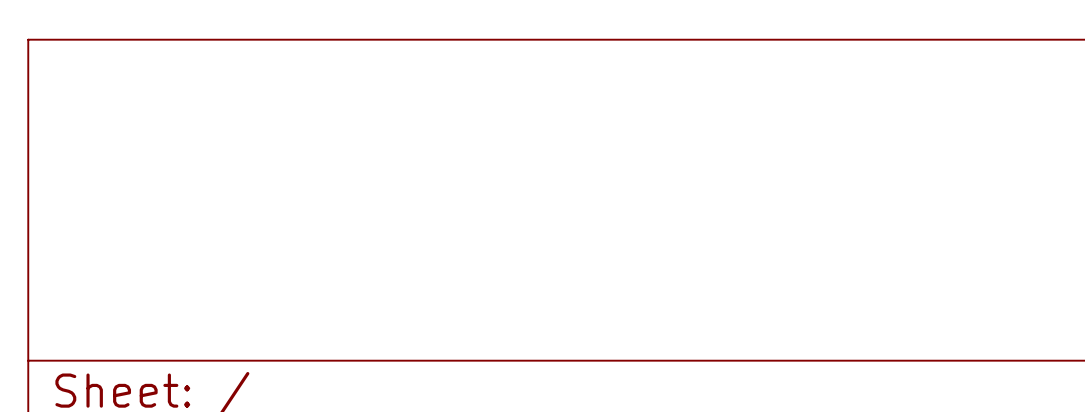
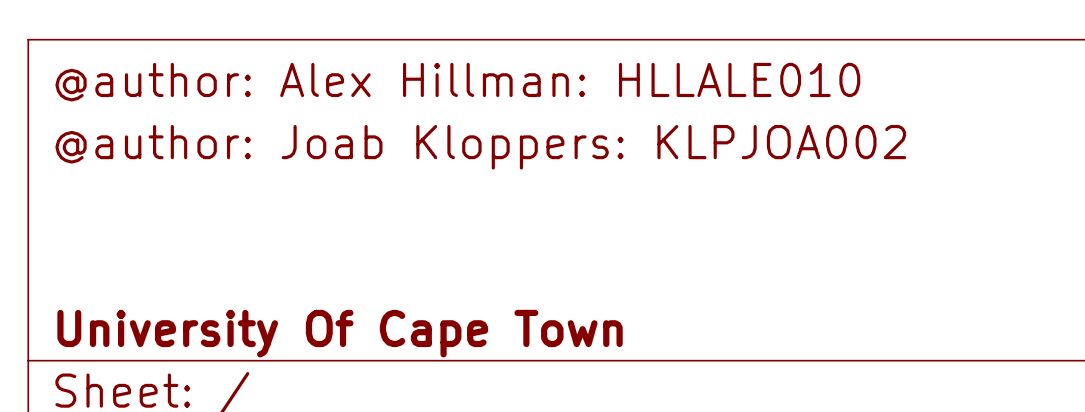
title block: none -> @author: Alex Hillman: HLLALE010 (457, 82)
title block: none -> @author: Joab Kloppers: KLPJOA002 (480, 147)
title block: none -> University Of Cape Town (340, 333)

